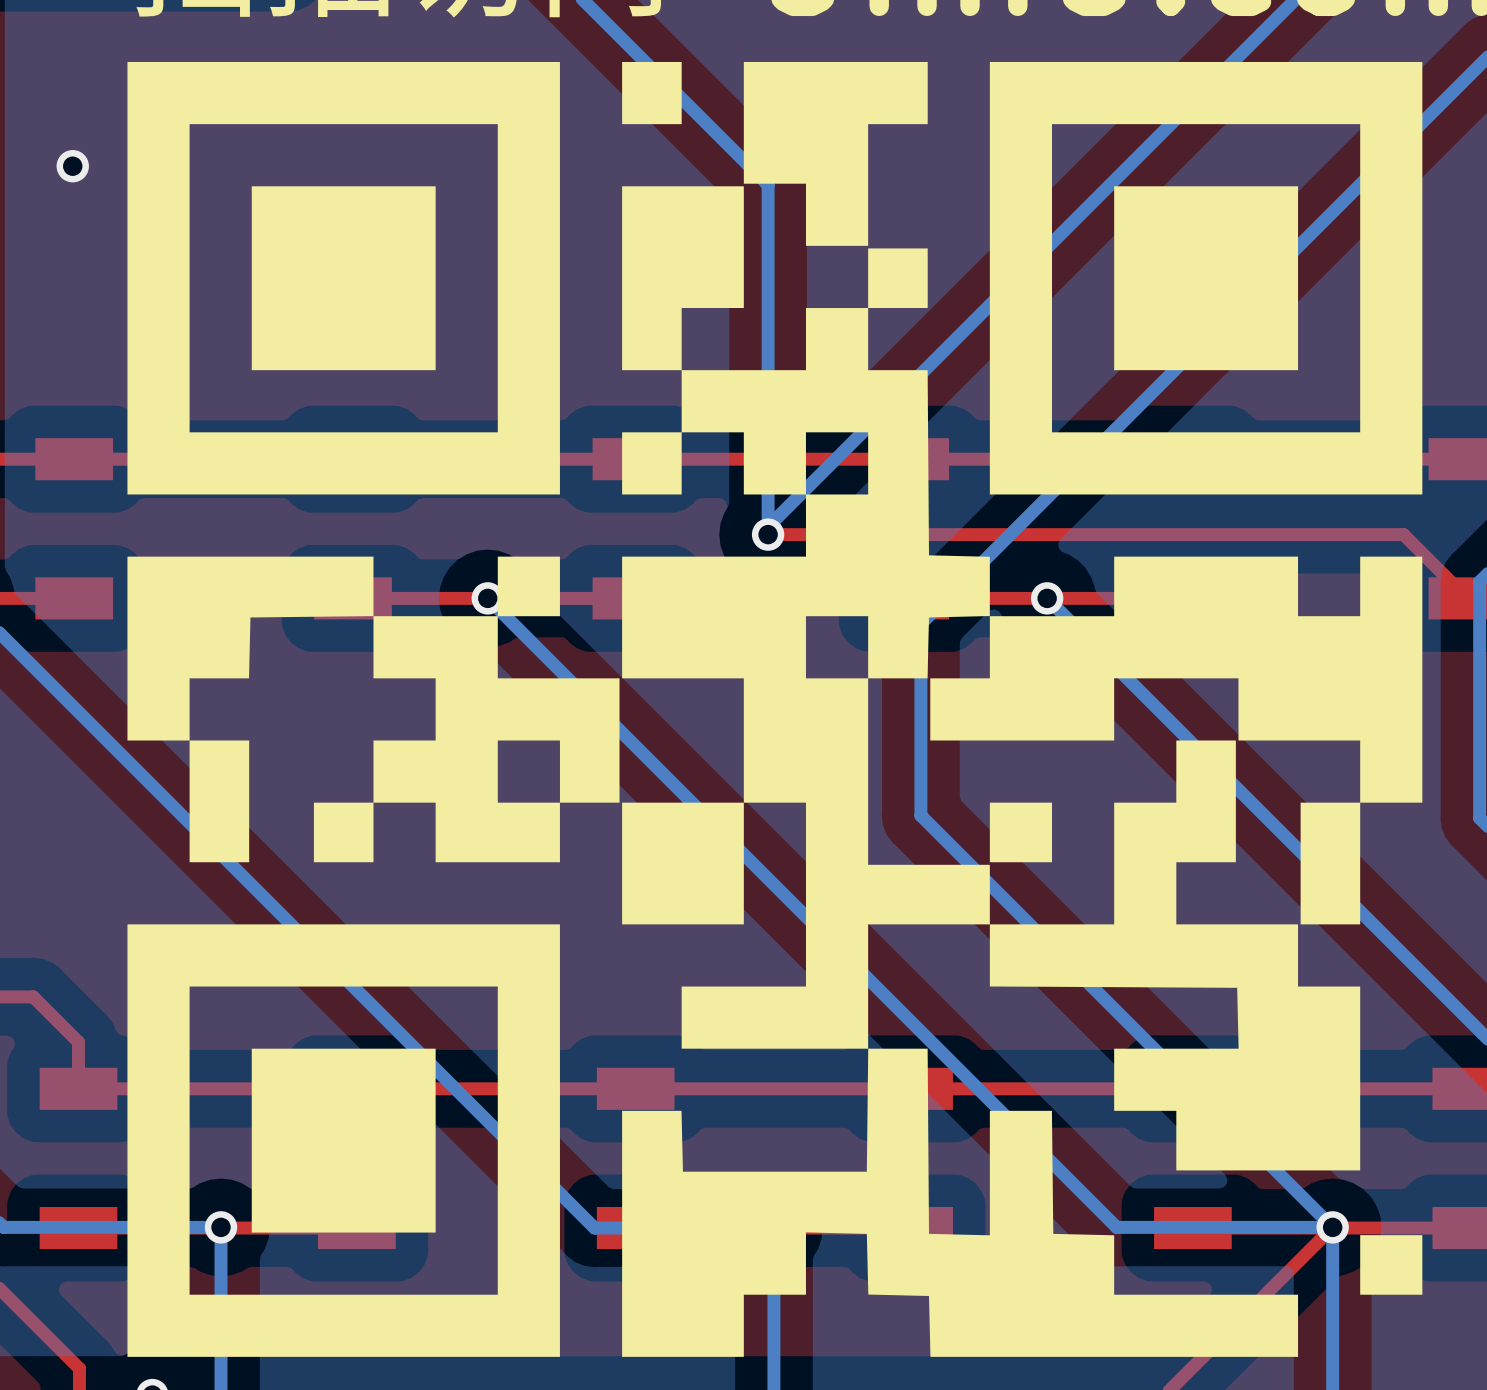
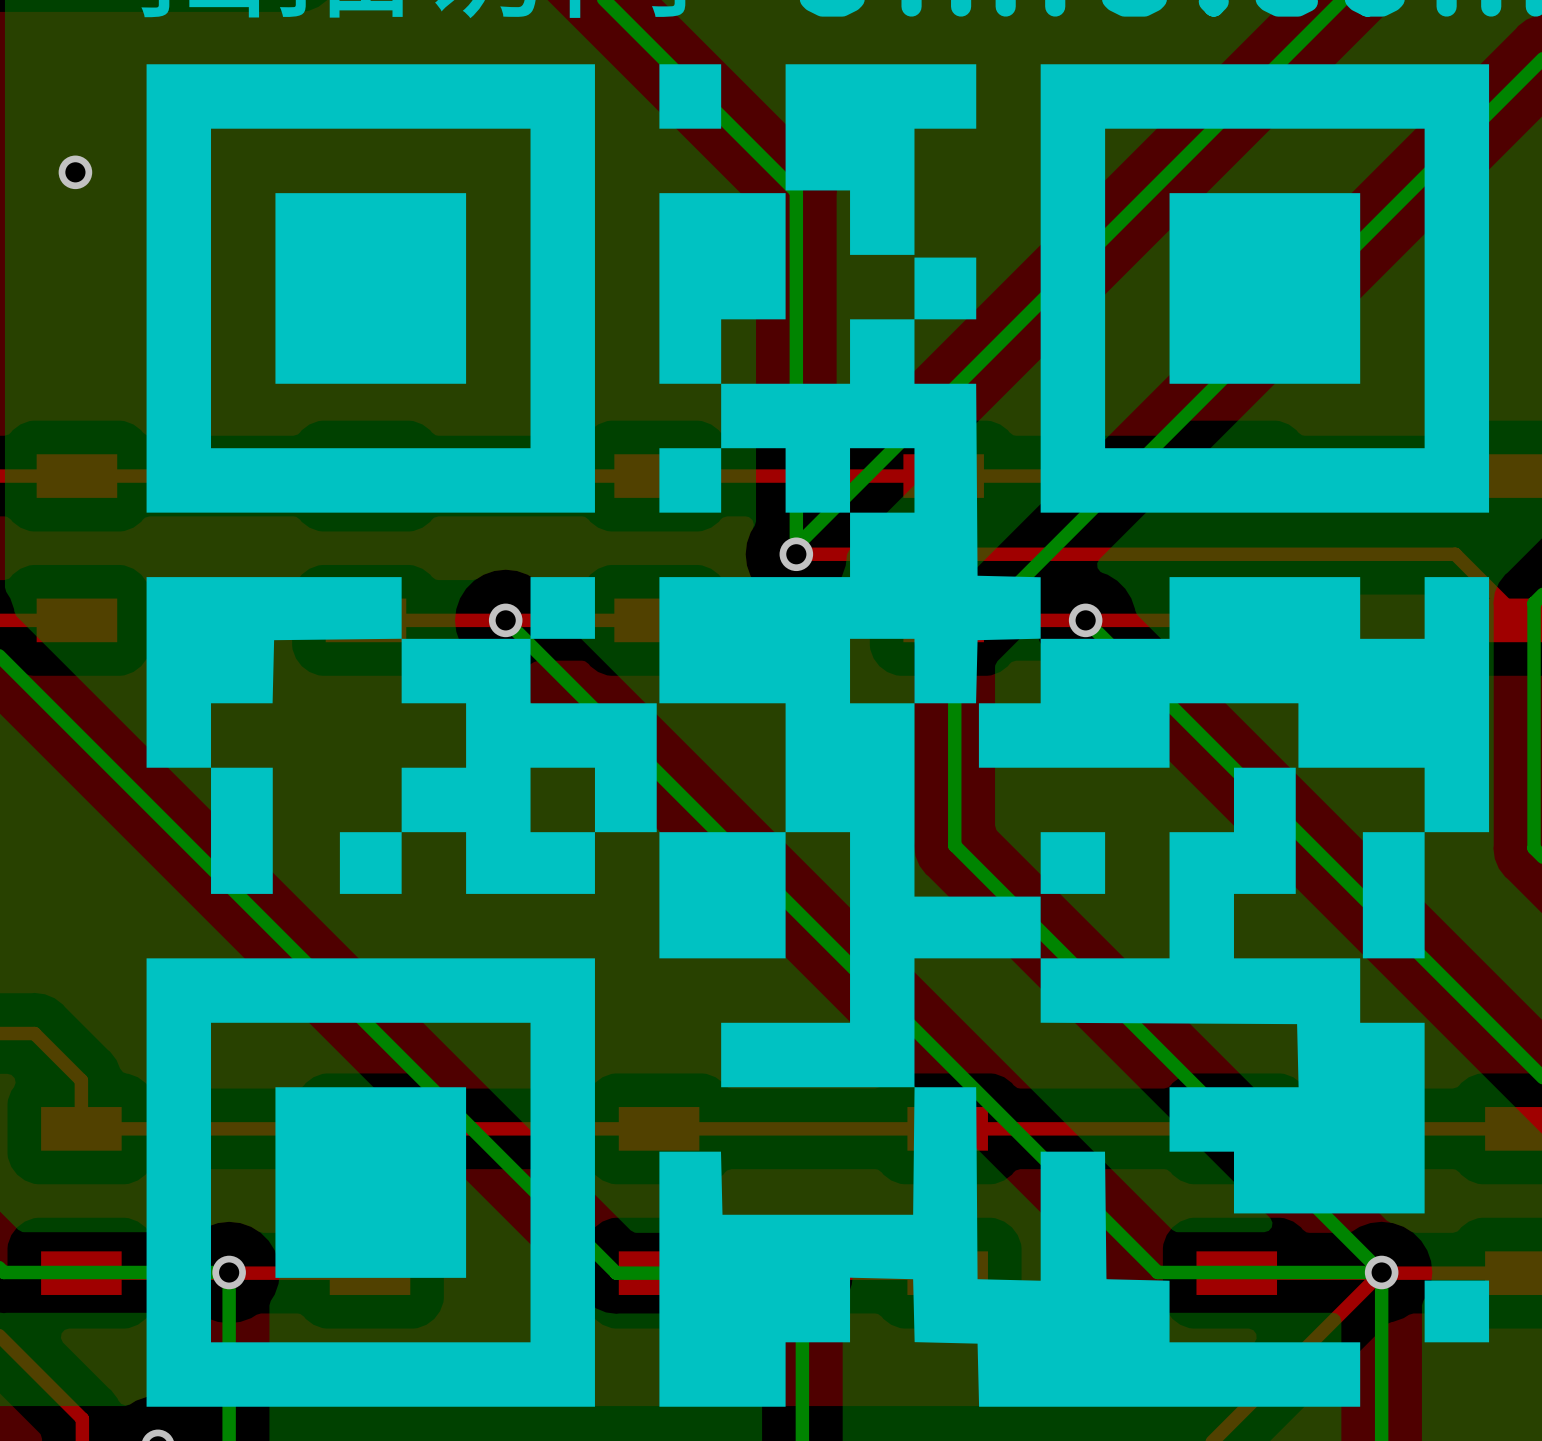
drawing position: (774, 709) -> (817, 735)

